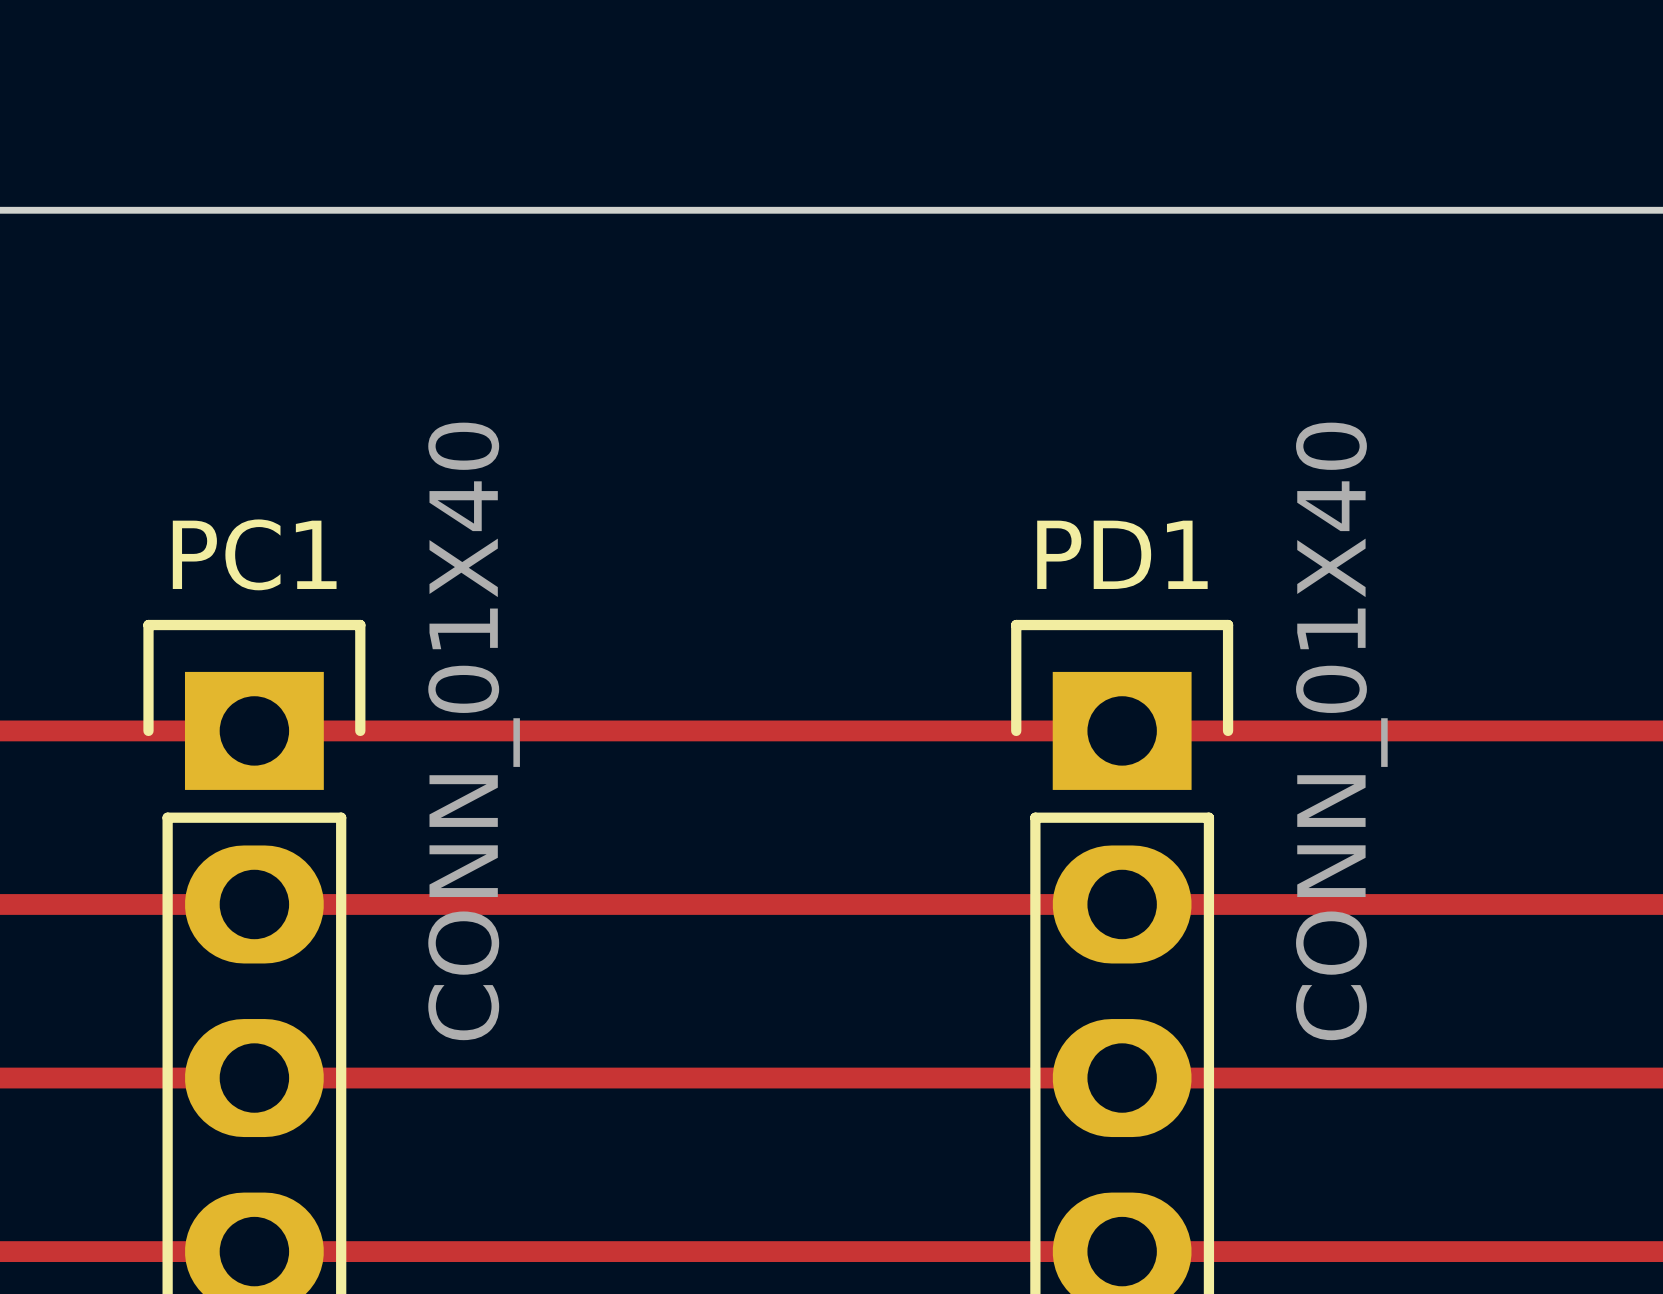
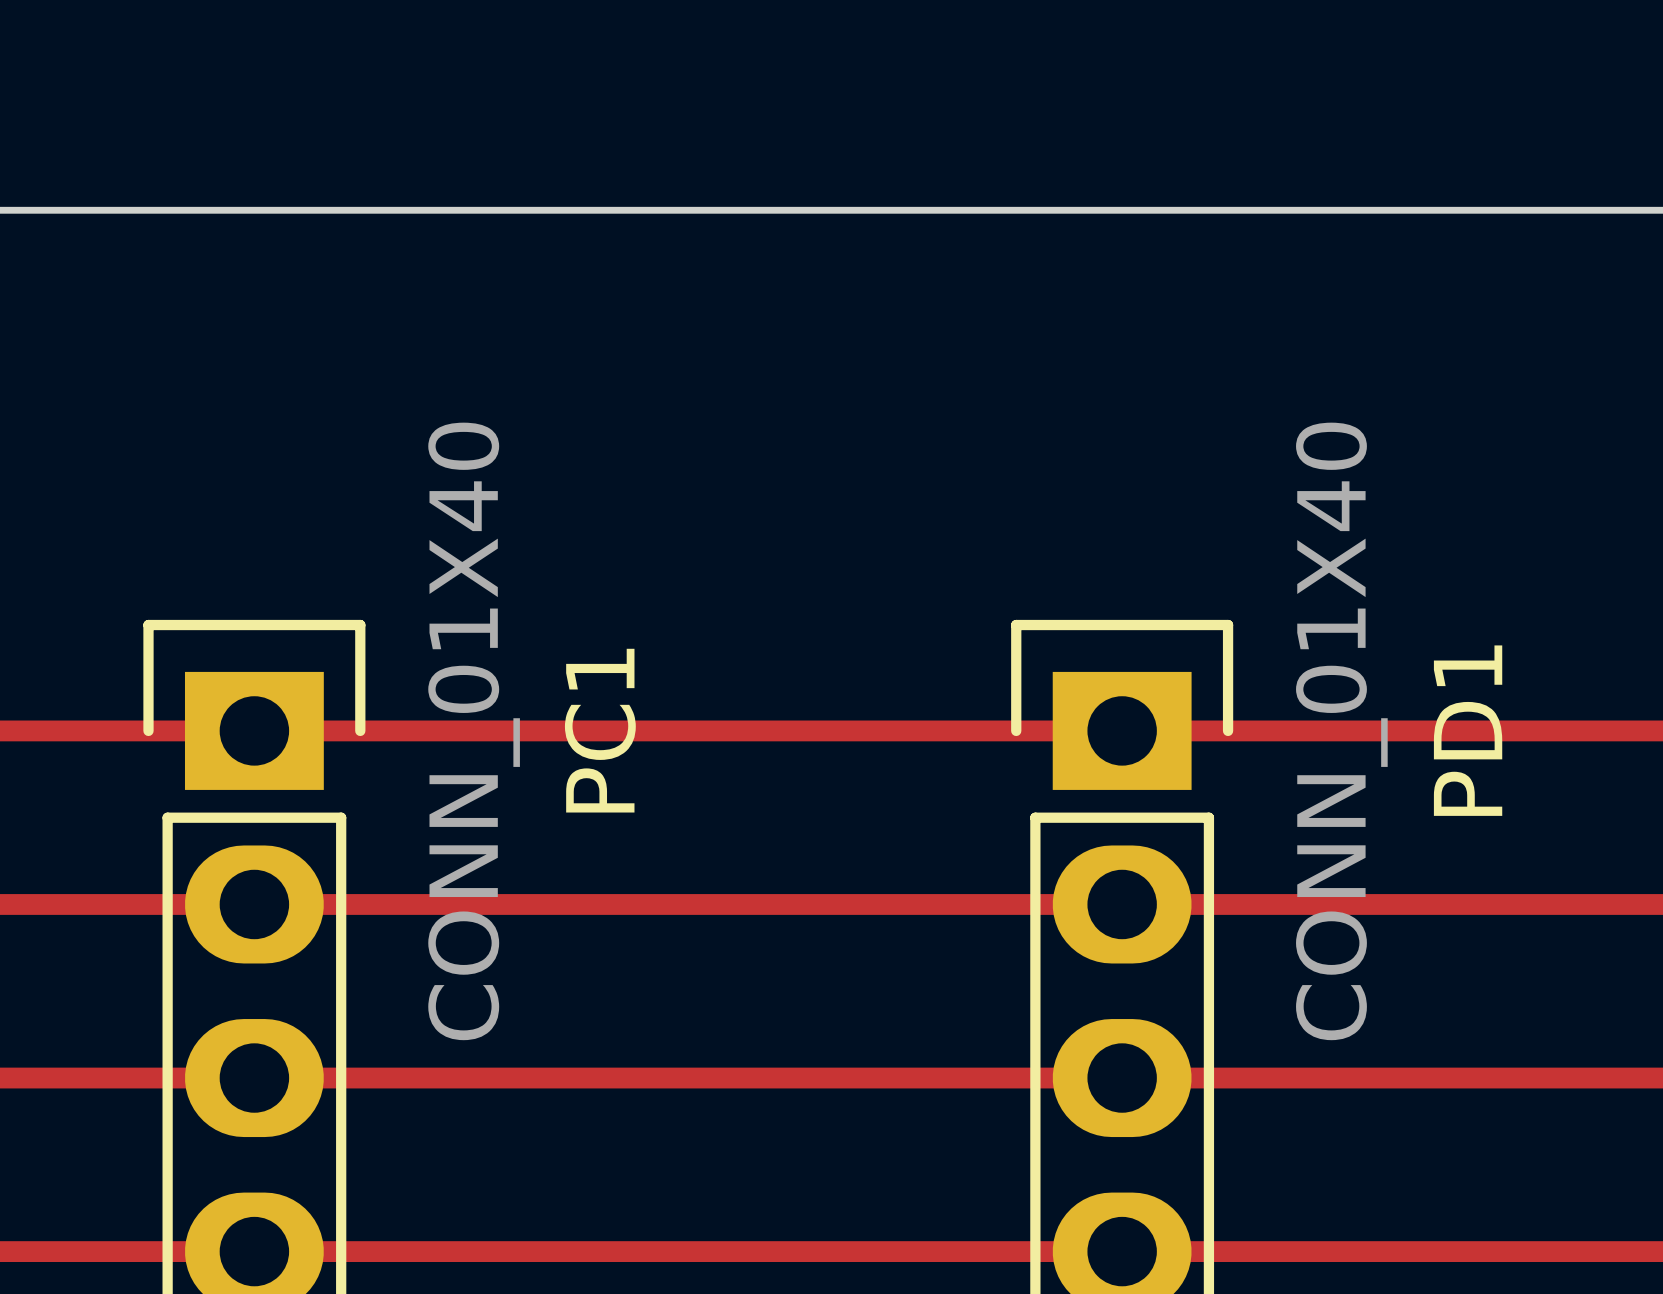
PC1 name rotation: 0° (254, 554) -> 90° counterclockwise (600, 730)
PC1 name position: PC1 (254, 554) -> PC1 (600, 730)
PD1 name rotation: 0° (1122, 554) -> 90° counterclockwise (1468, 730)
PD1 name position: PD1 (1122, 554) -> PD1 (1468, 730)

